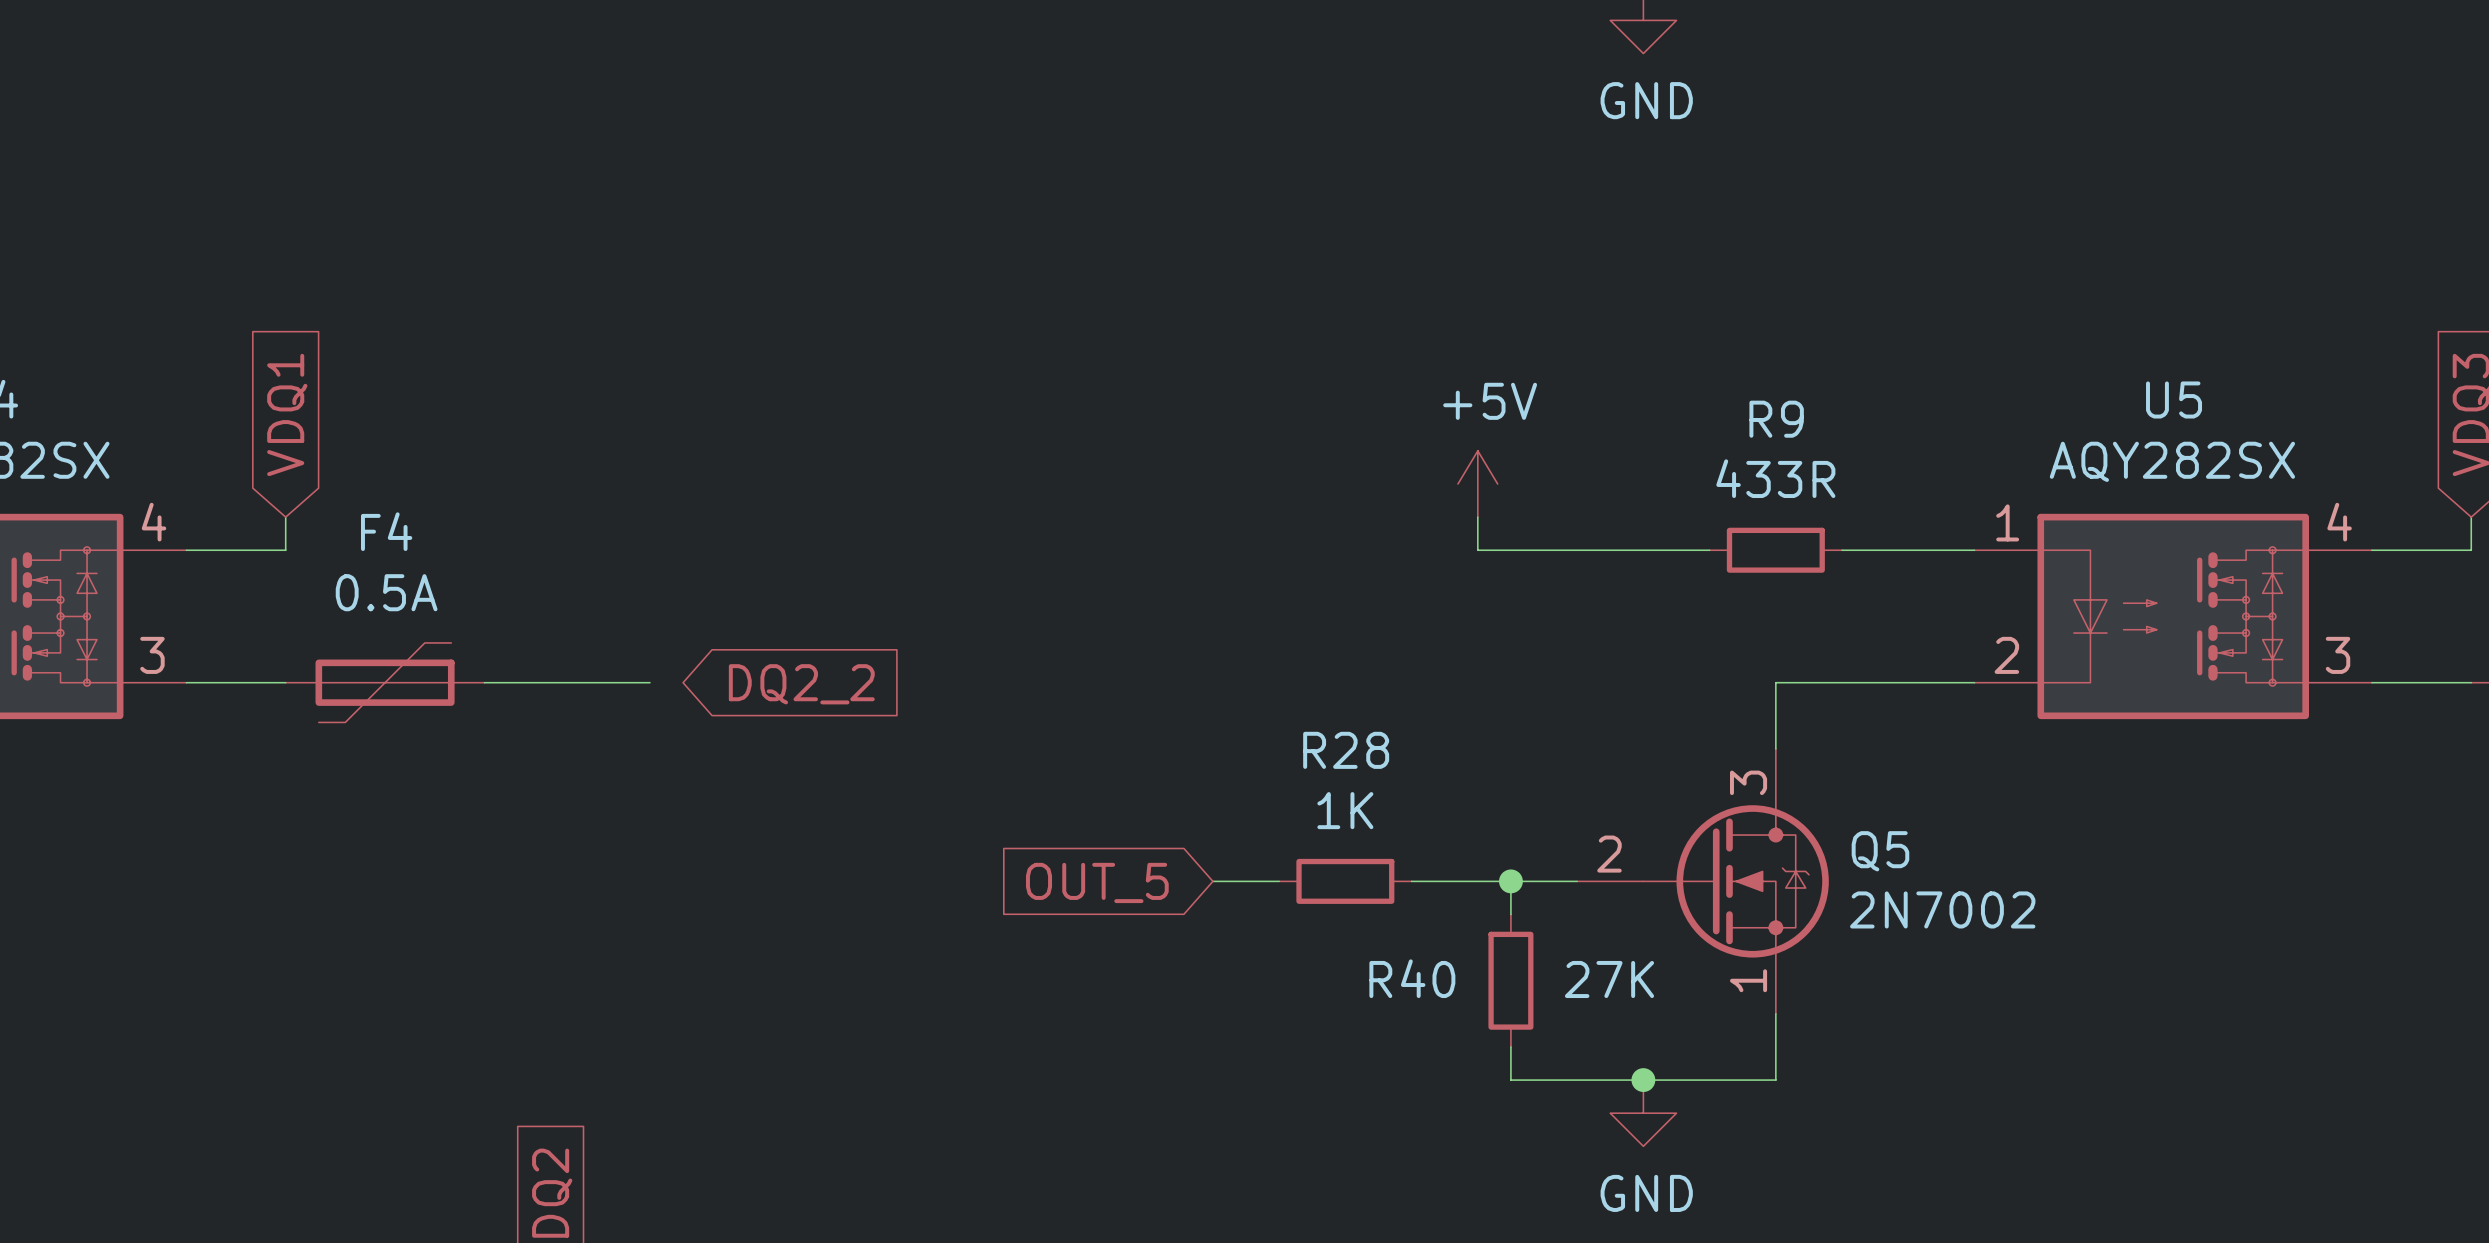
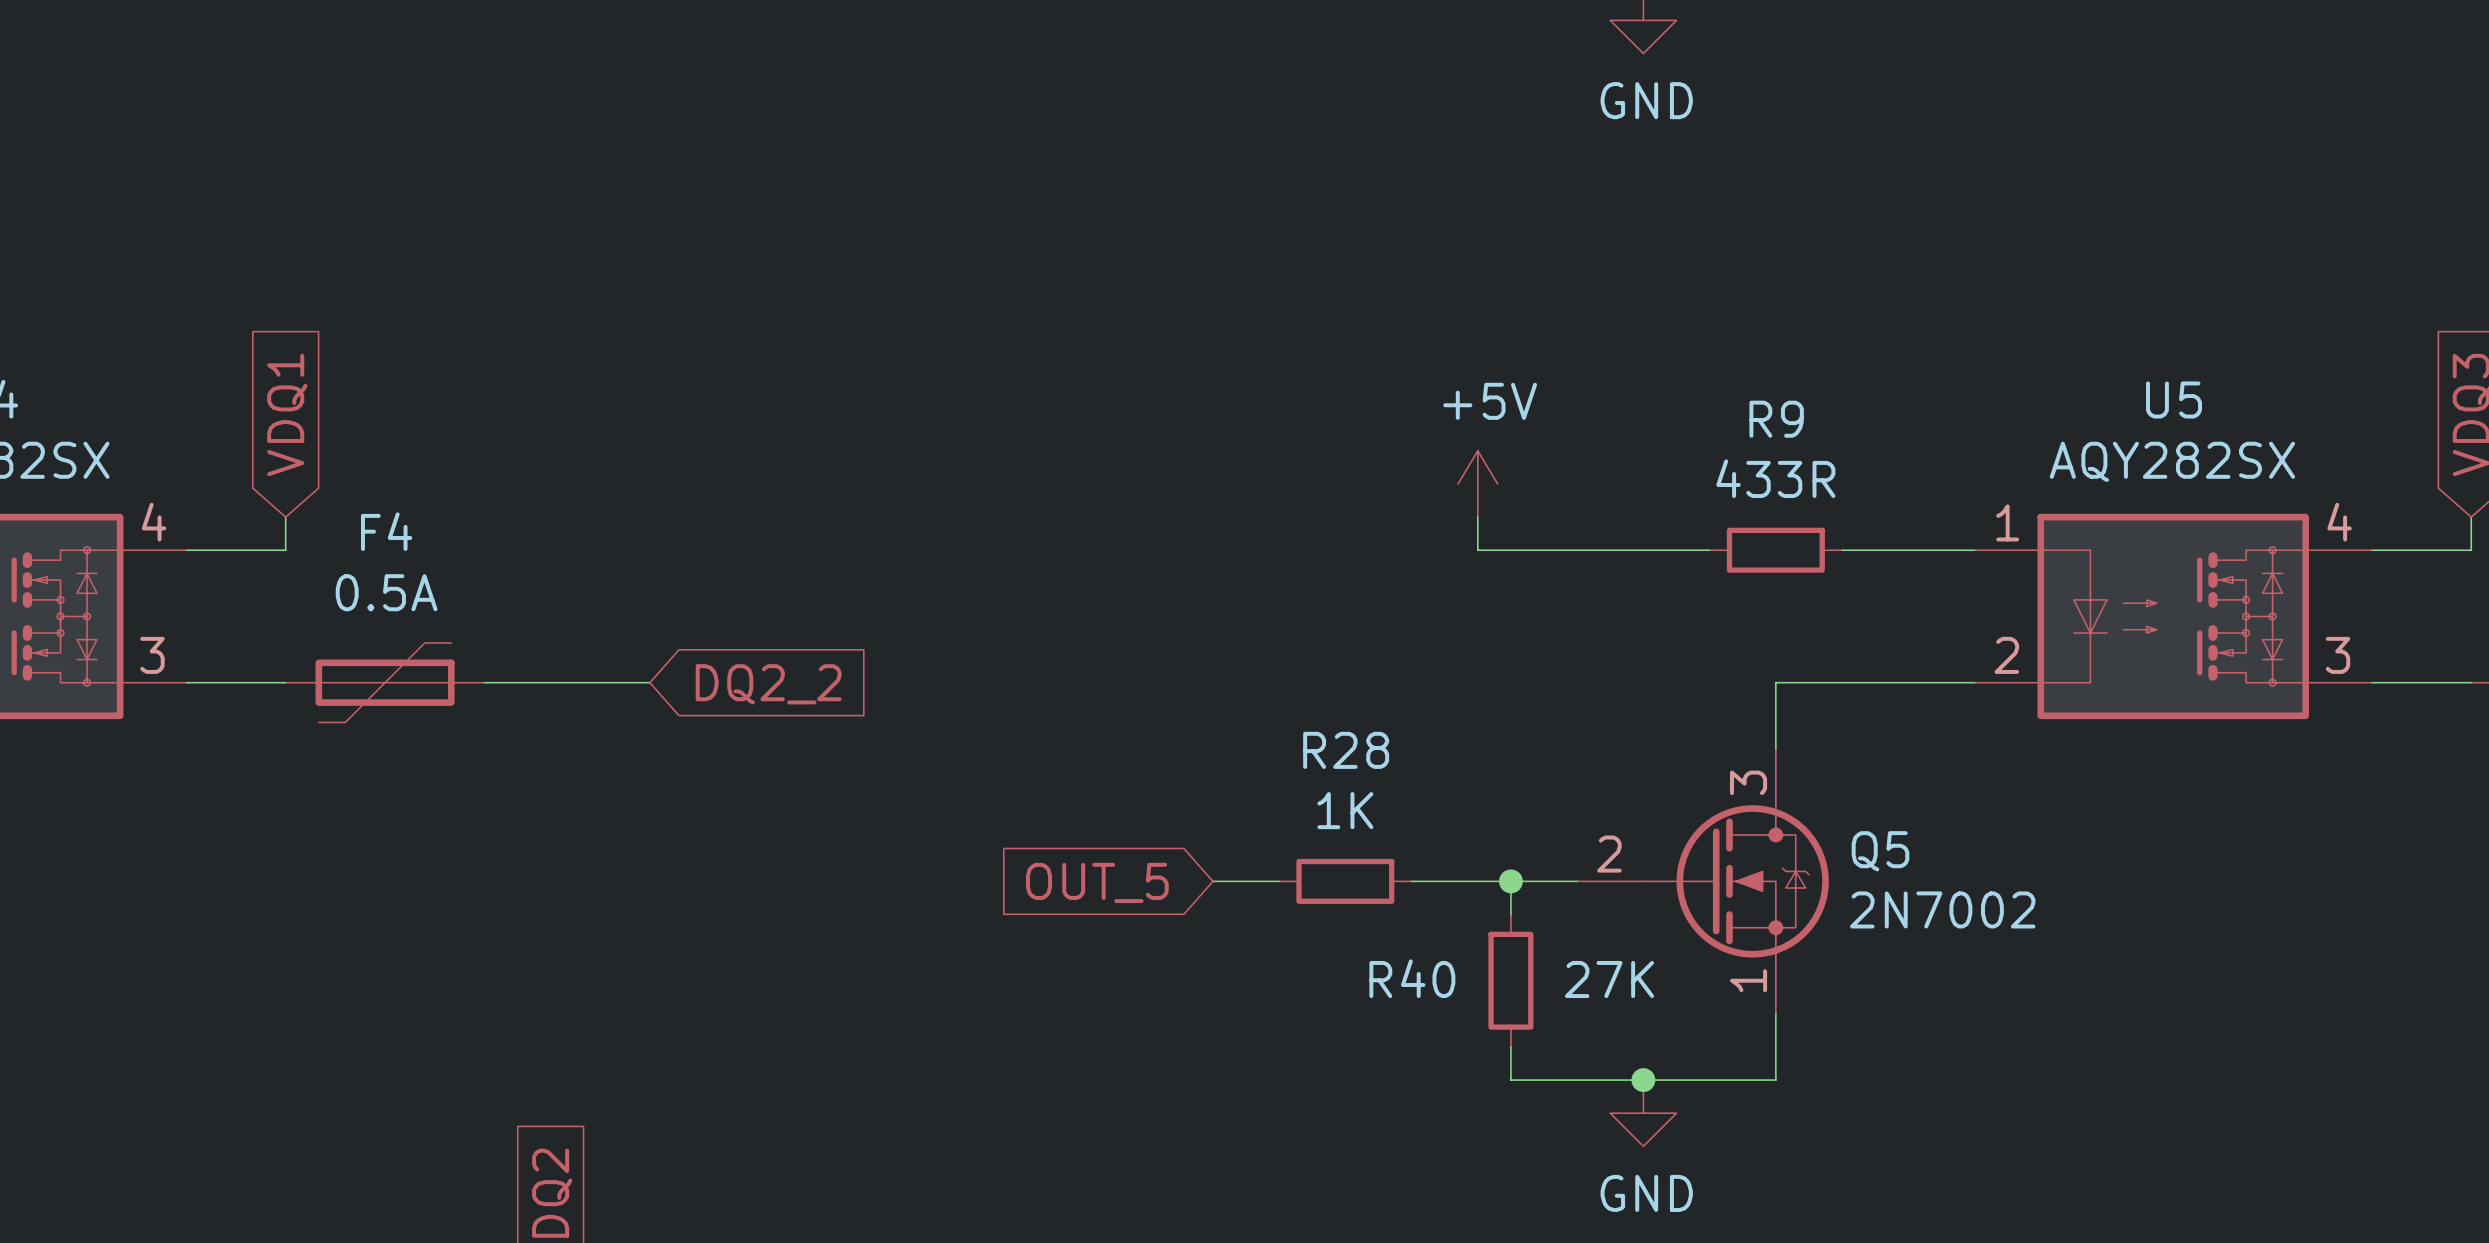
global label position: DQ2_2 (801, 684) -> DQ2_2 (768, 684)

